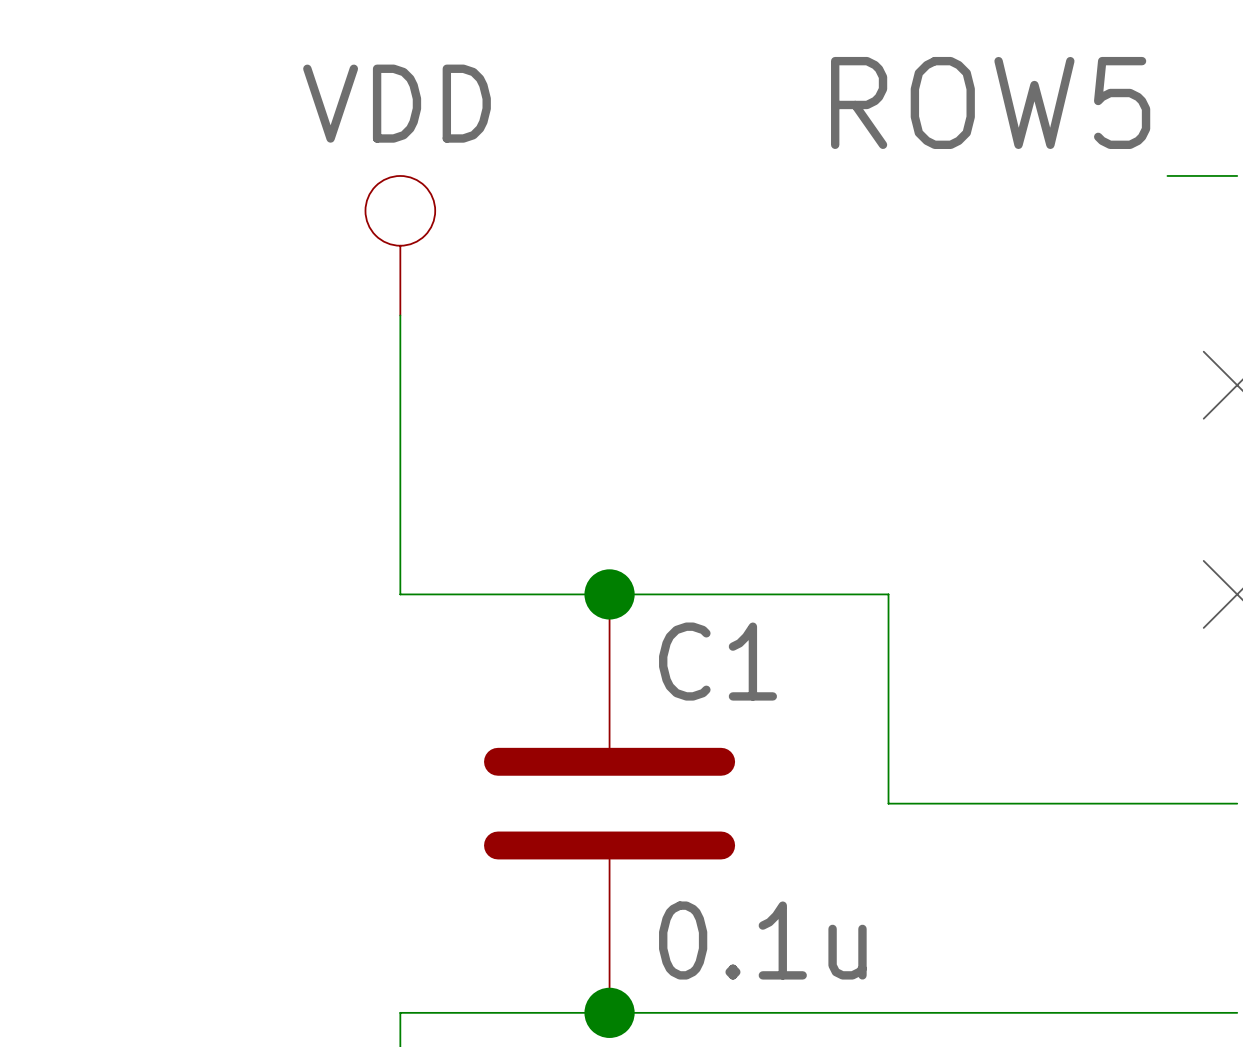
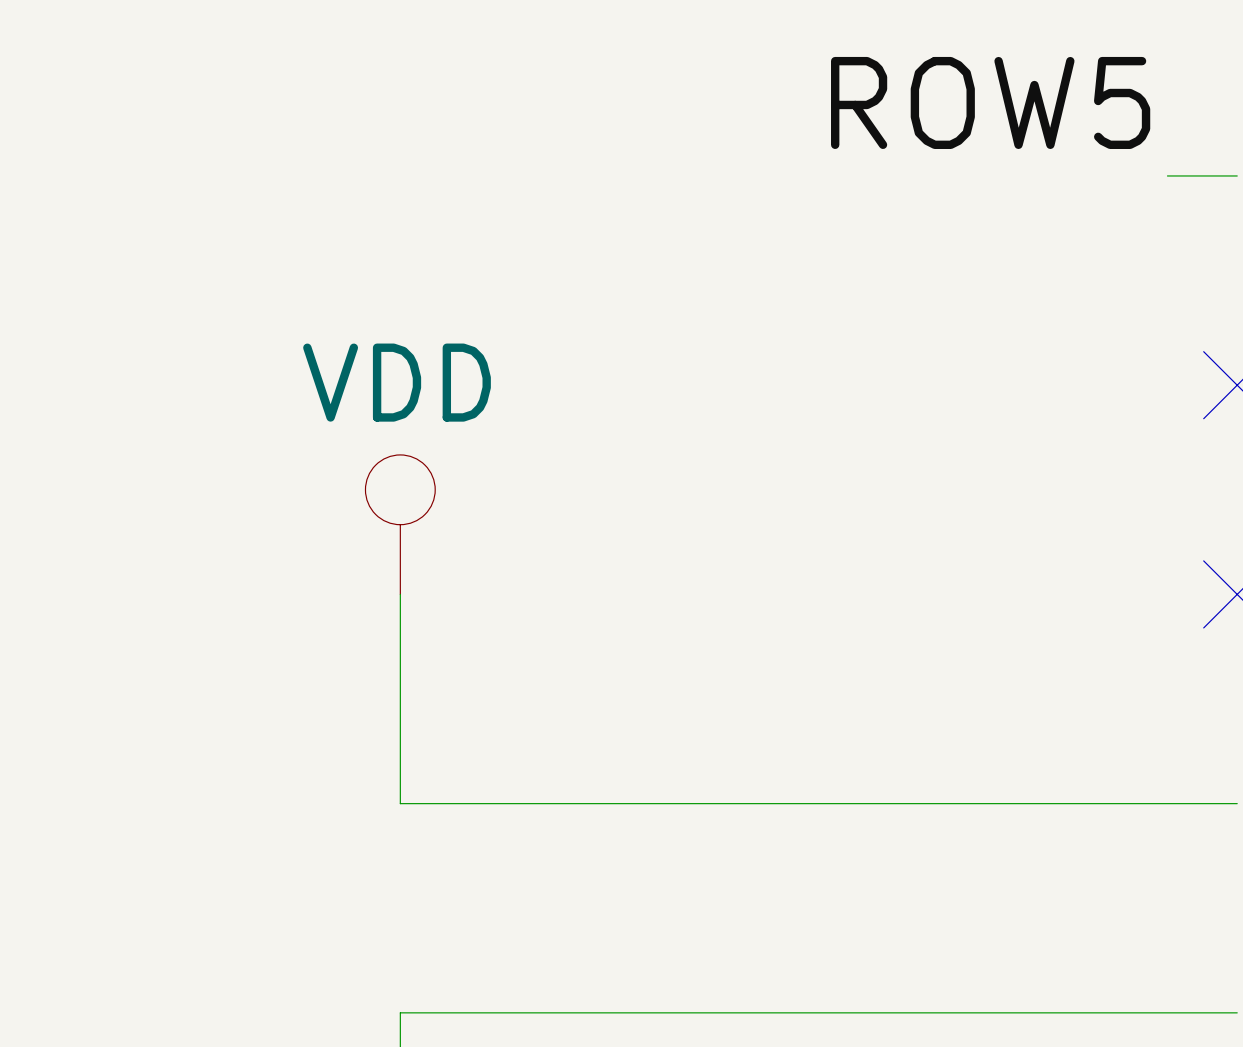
power symbol position: VDD (400, 245) -> VDD (400, 524)
wire: (400, 315) (400, 594) (888, 594) (888, 803) -> (400, 594) (400, 803) (888, 803)
junction: (609, 594) -> none
C1: 0.1u (609, 803) -> none
junction: (609, 1012) -> none

